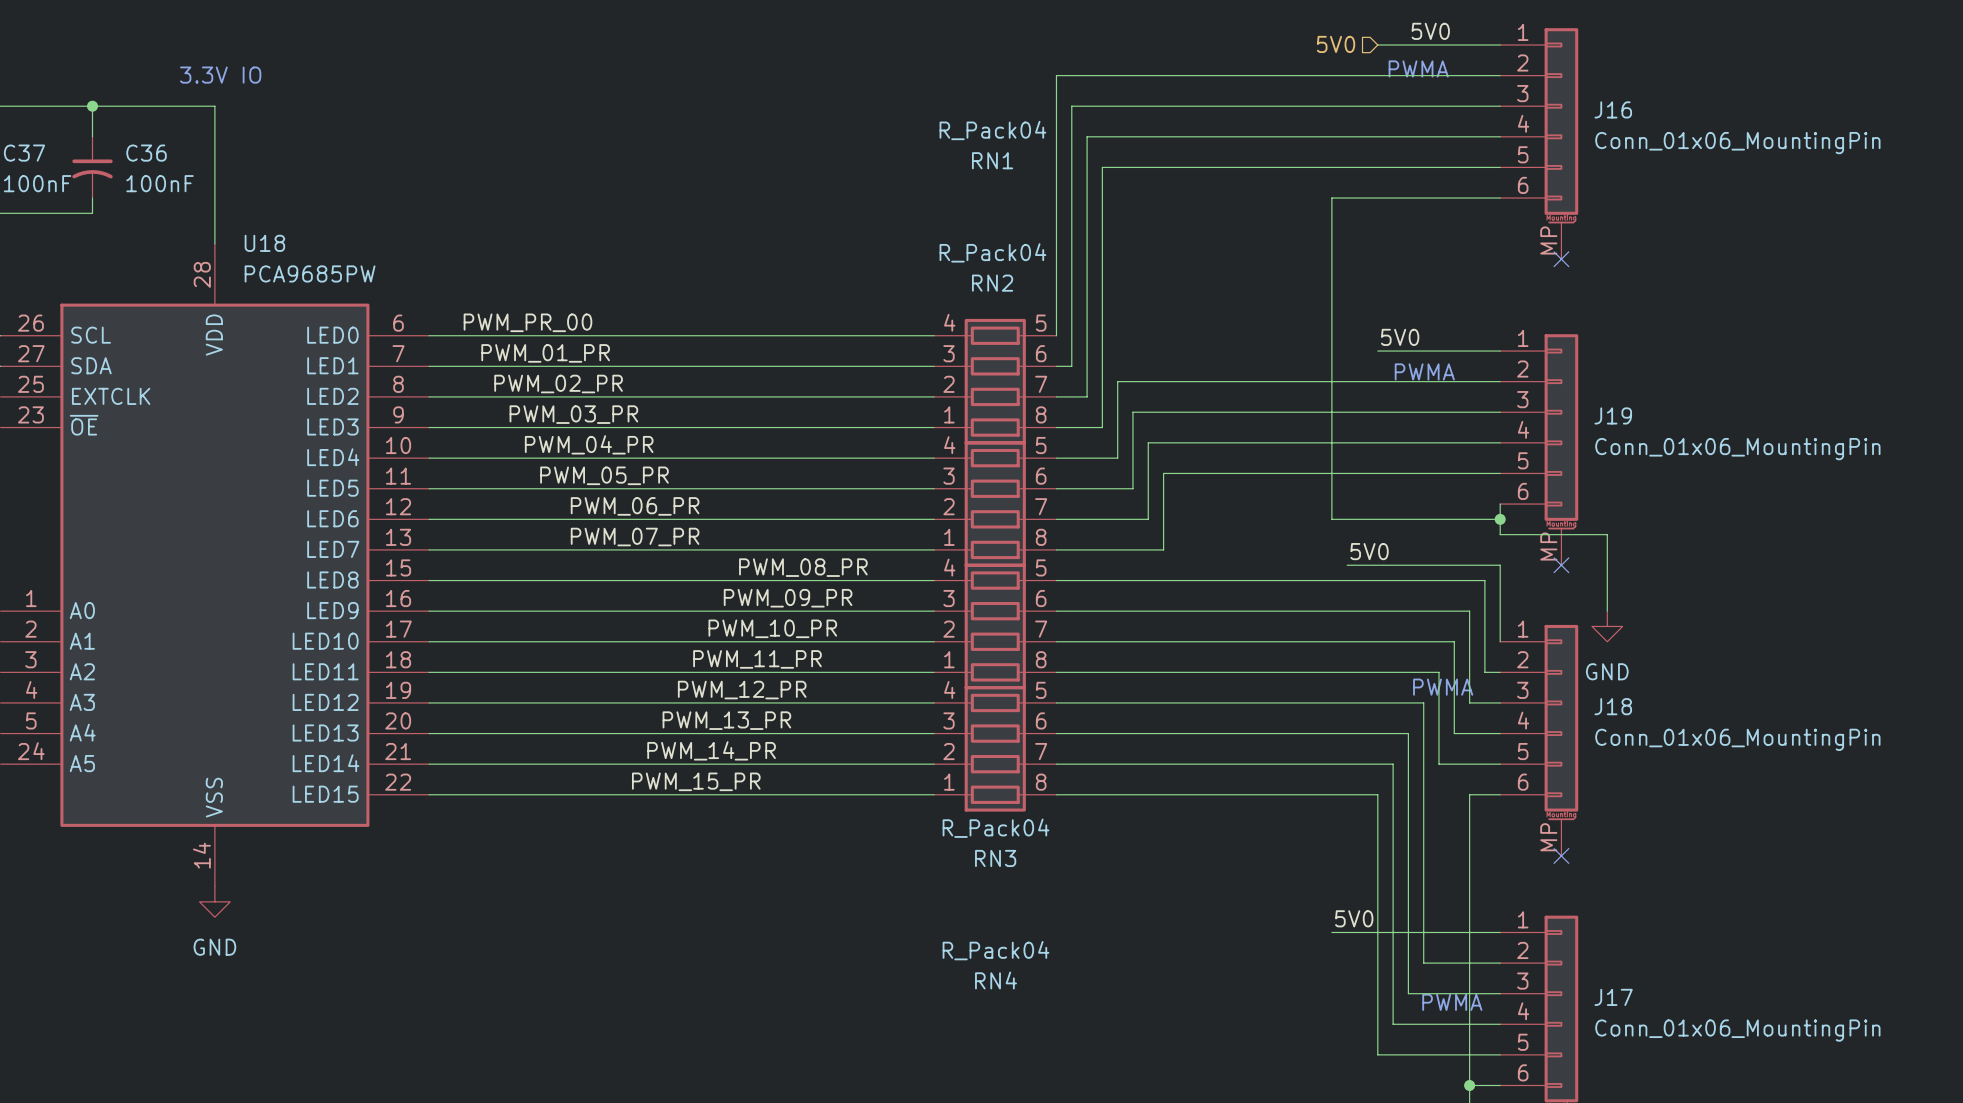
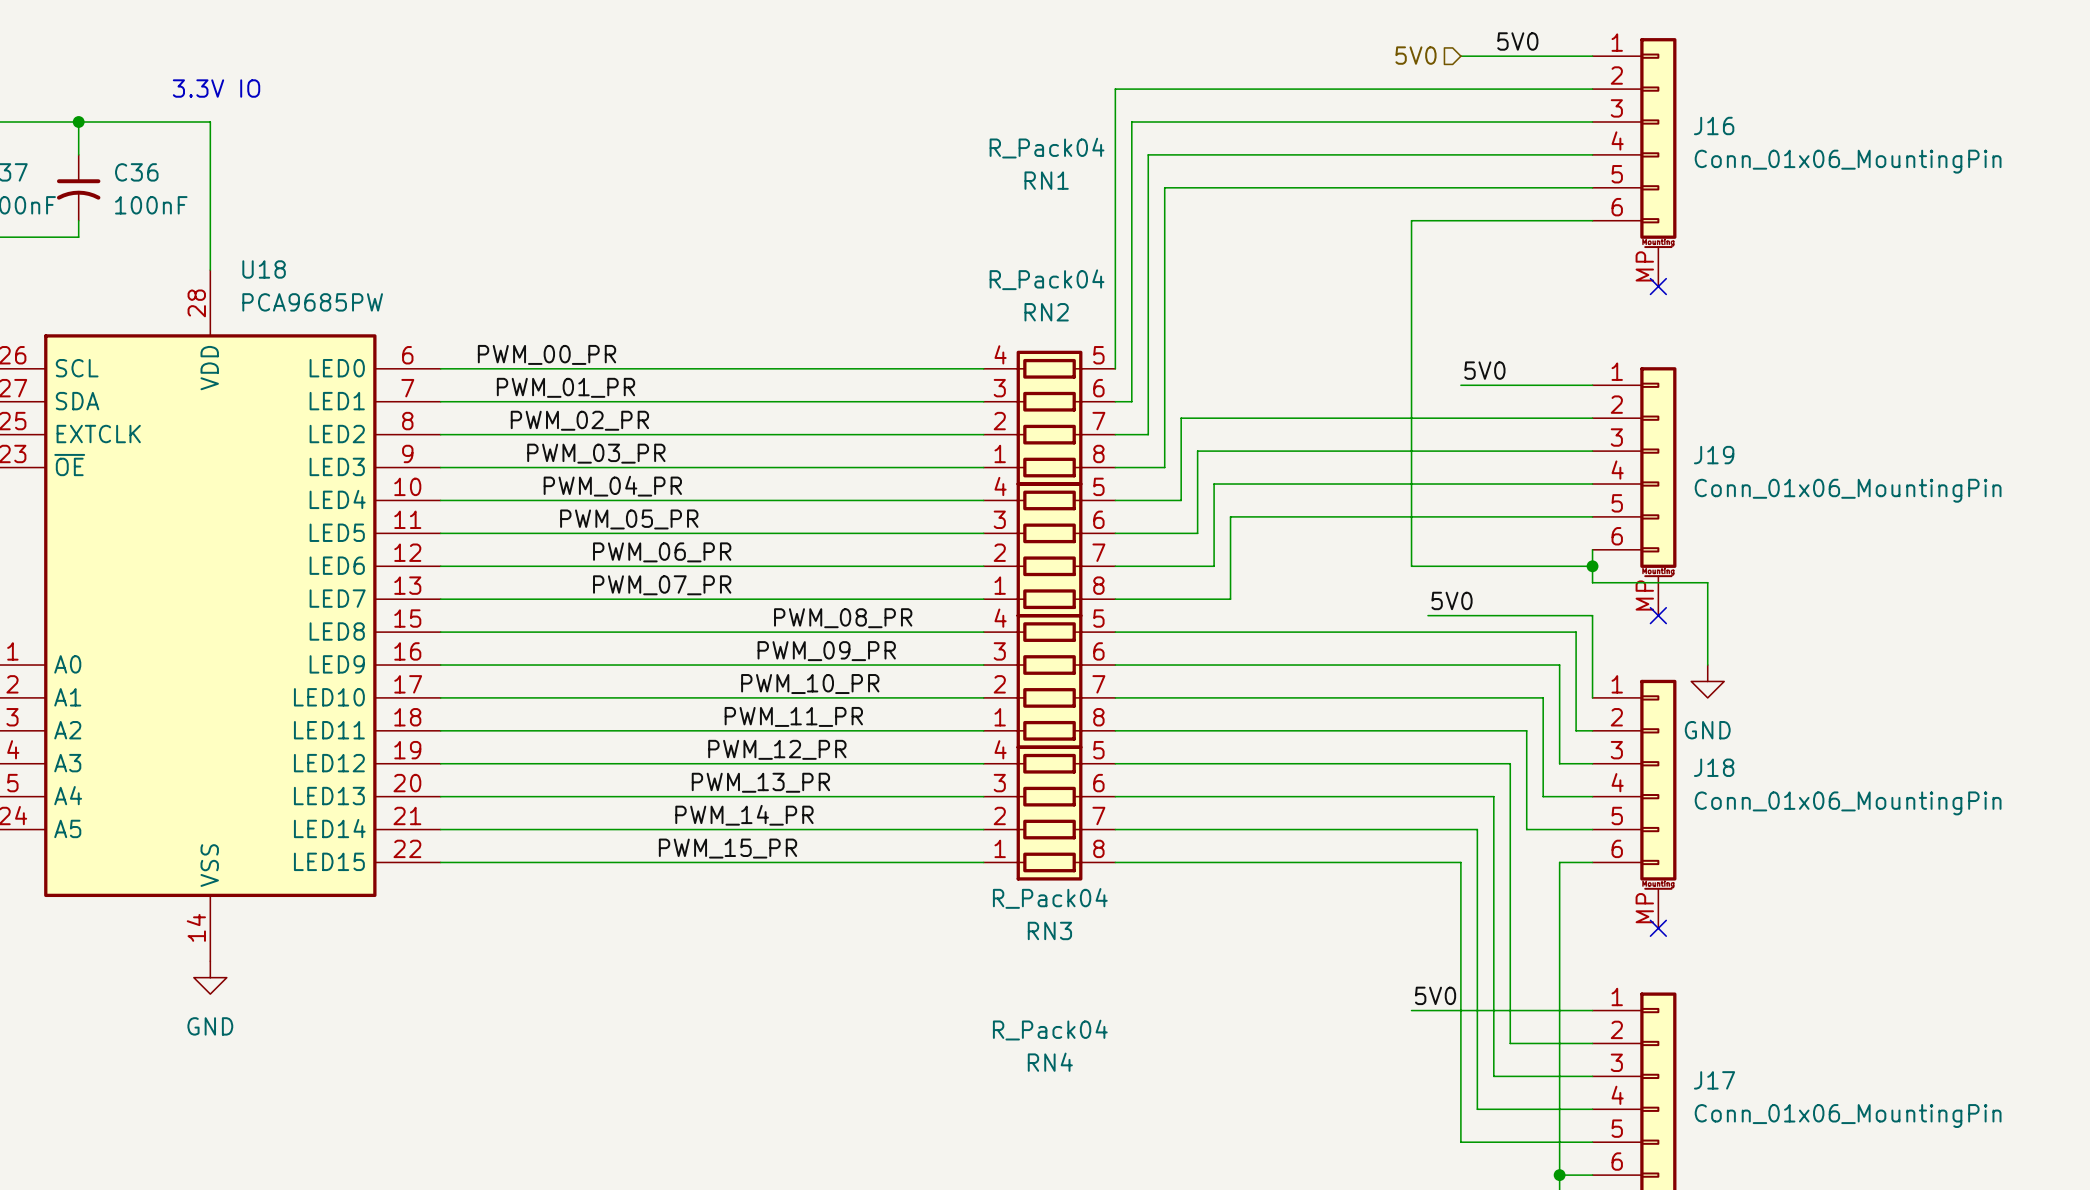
text: PWMA (1418, 68) -> none
label: PWM_PR_00 (527, 322) -> PWM_00_PR (546, 354)
text: PWMA (1424, 371) -> none
text: PWMA (1443, 687) -> none
text: PWMA (1452, 1002) -> none

